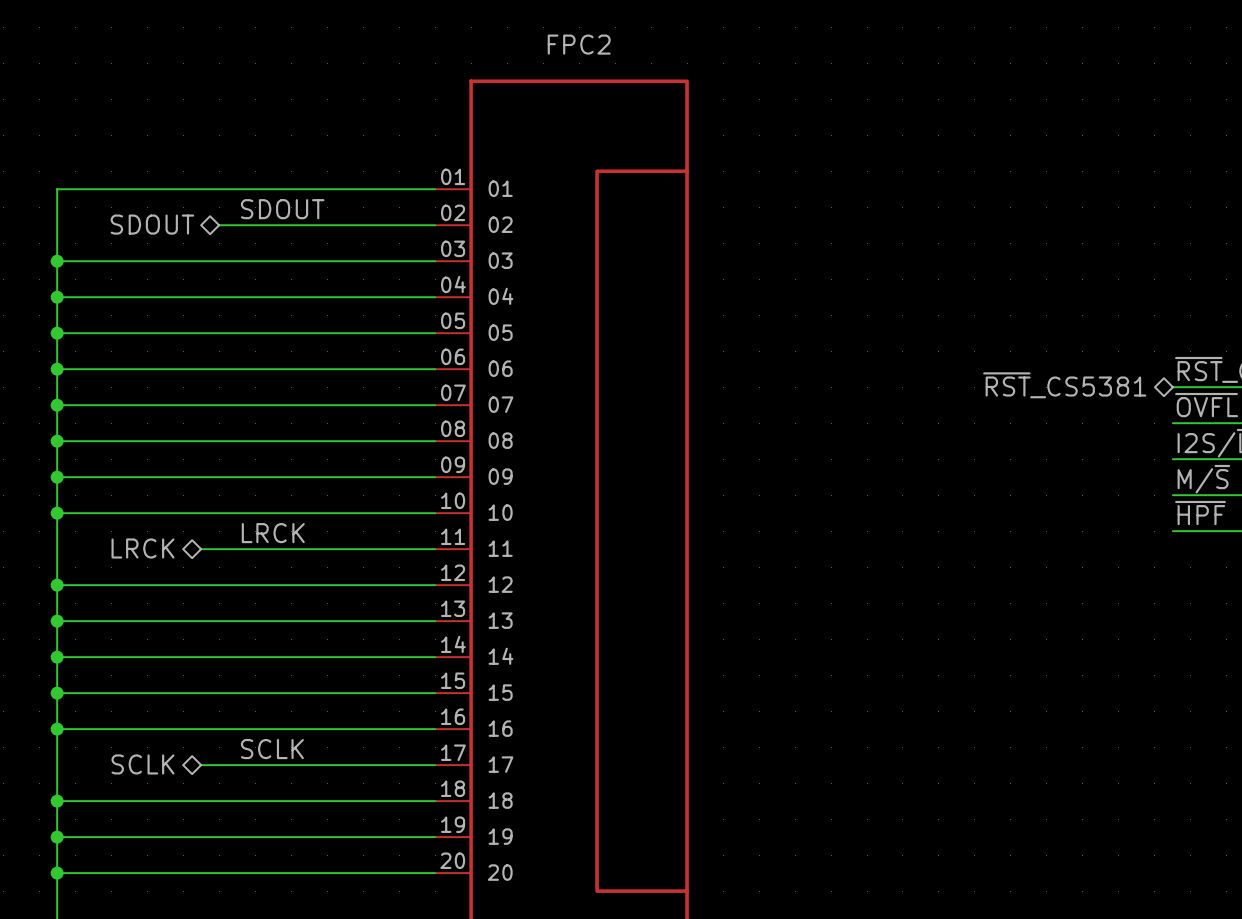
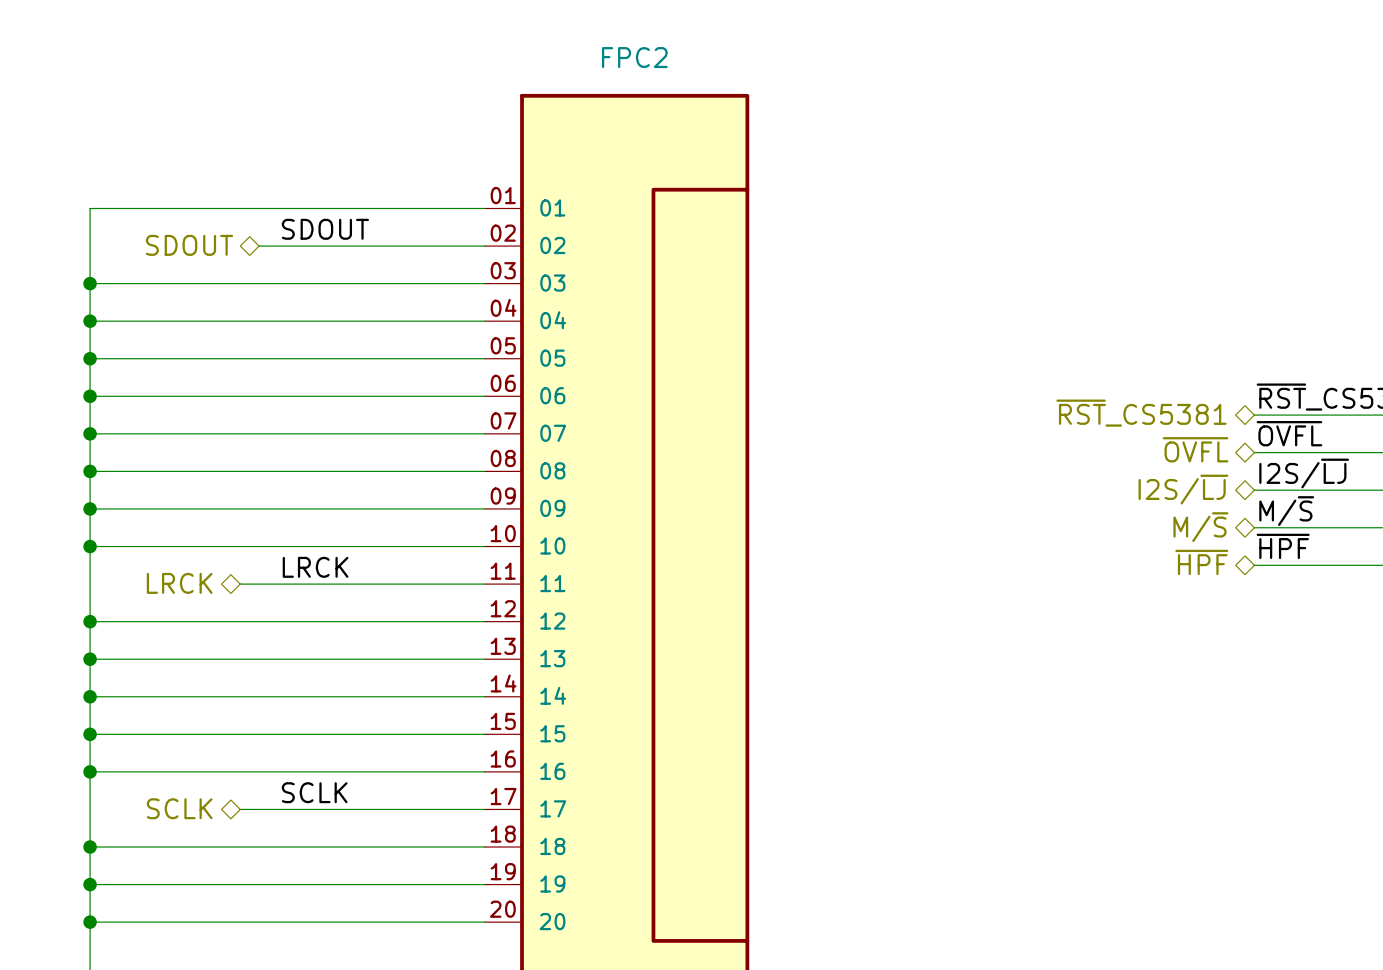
hierarchical label: none -> ~{OVFL} (1195, 449)
hierarchical label: none -> I2S/~{LJ} (1183, 489)
hierarchical label: none -> M/~{S} (1200, 527)
hierarchical label: none -> ~{HPF} (1201, 562)

